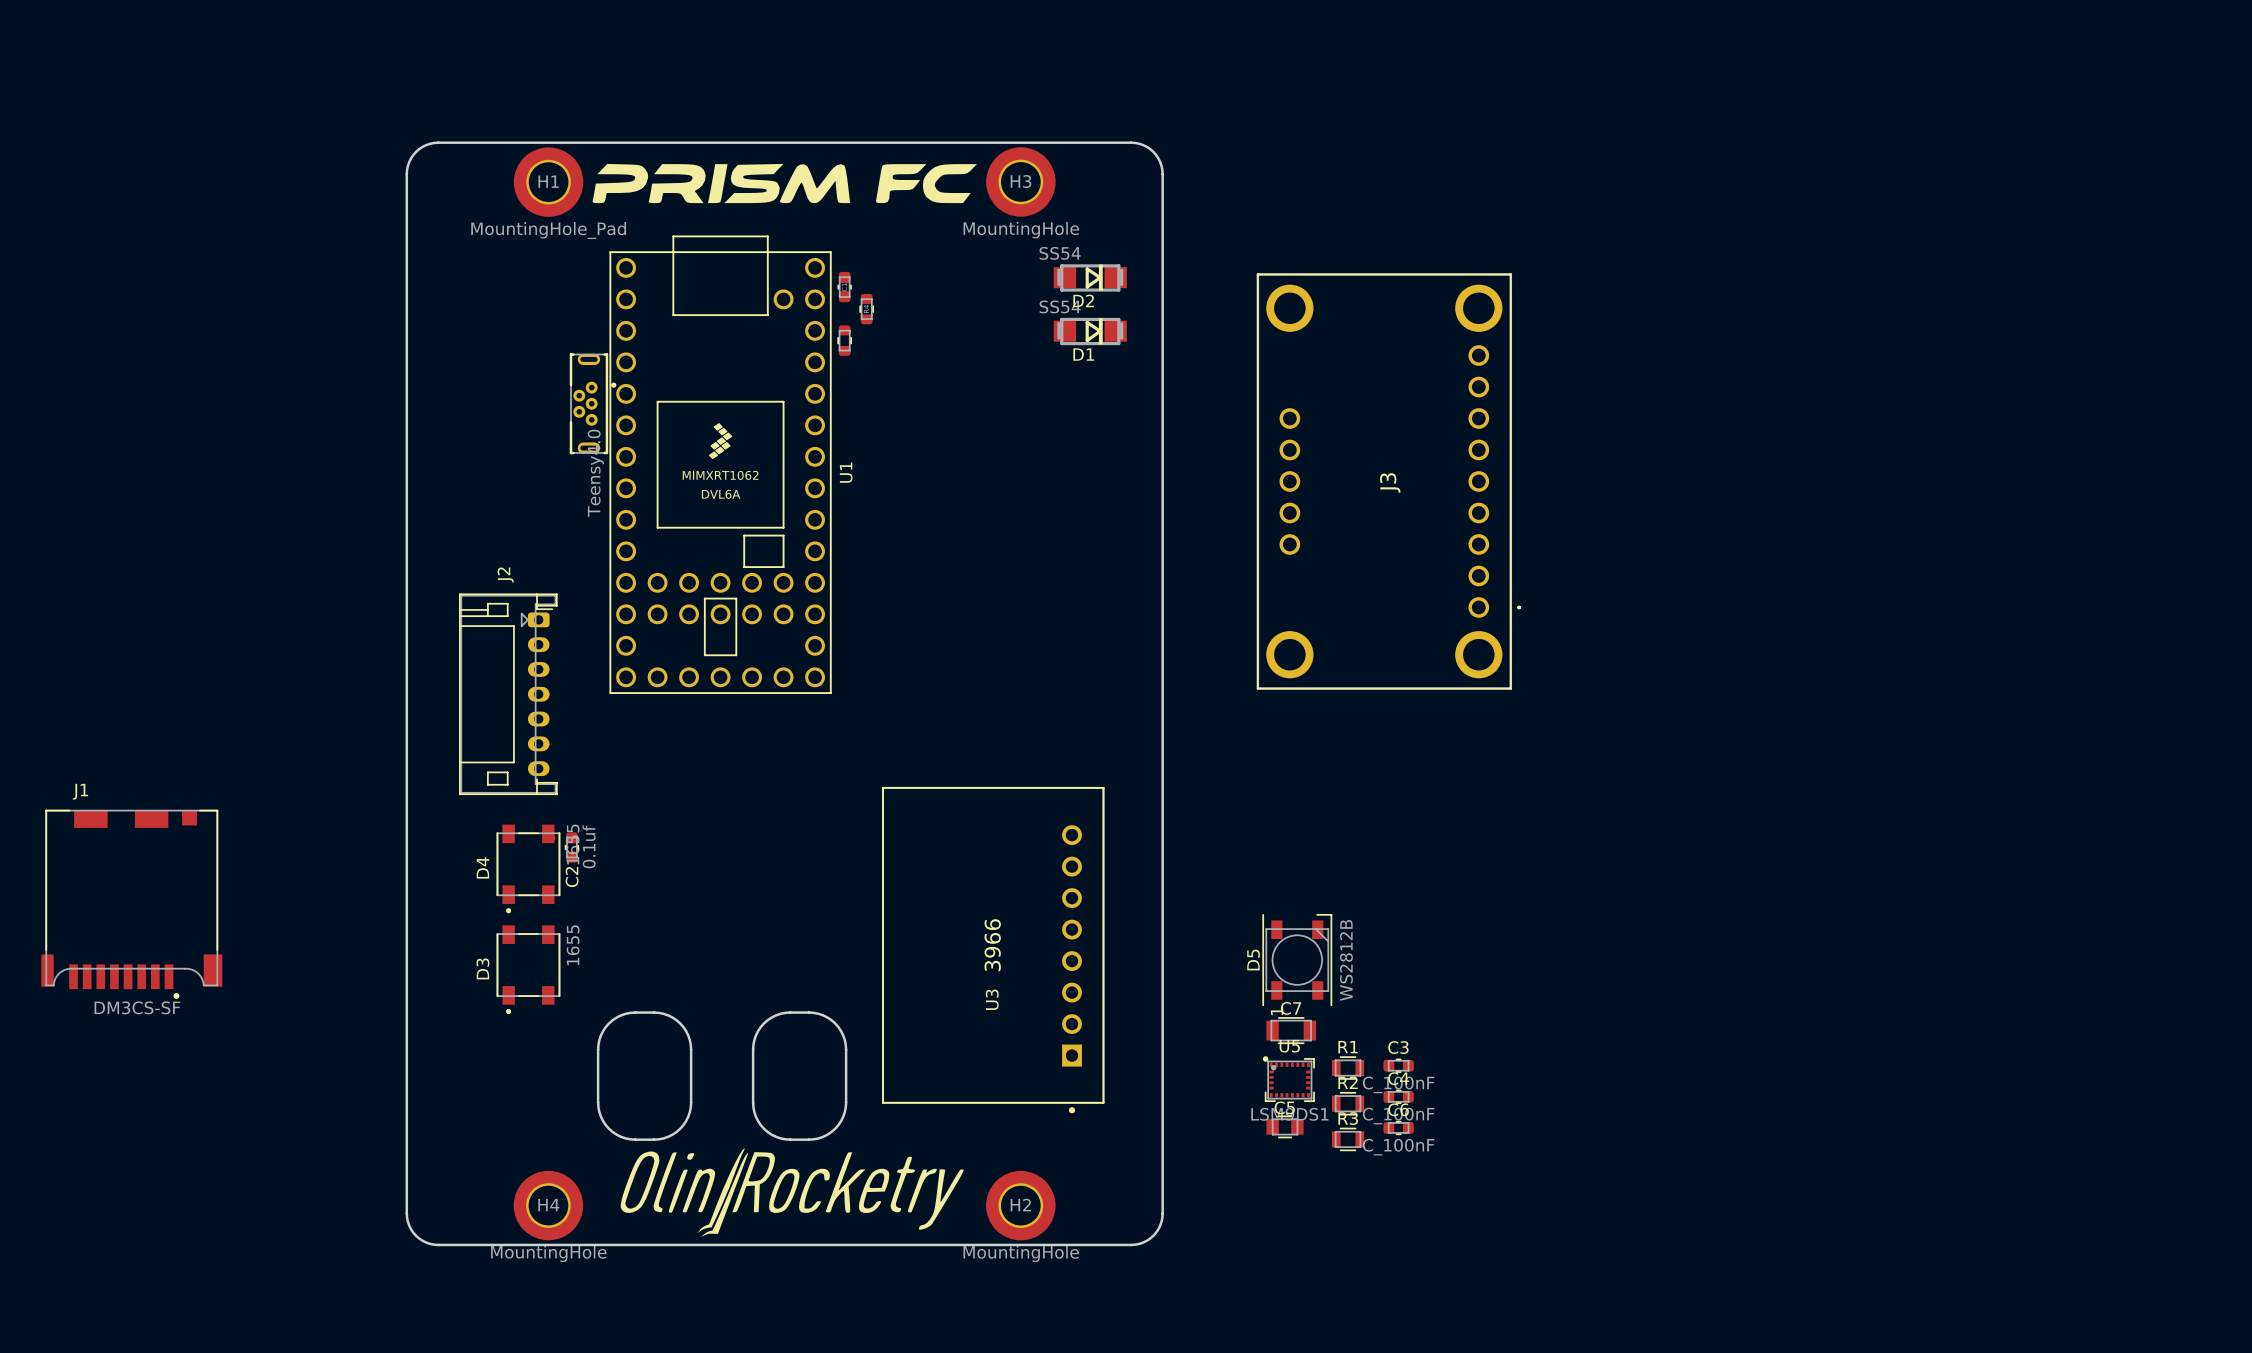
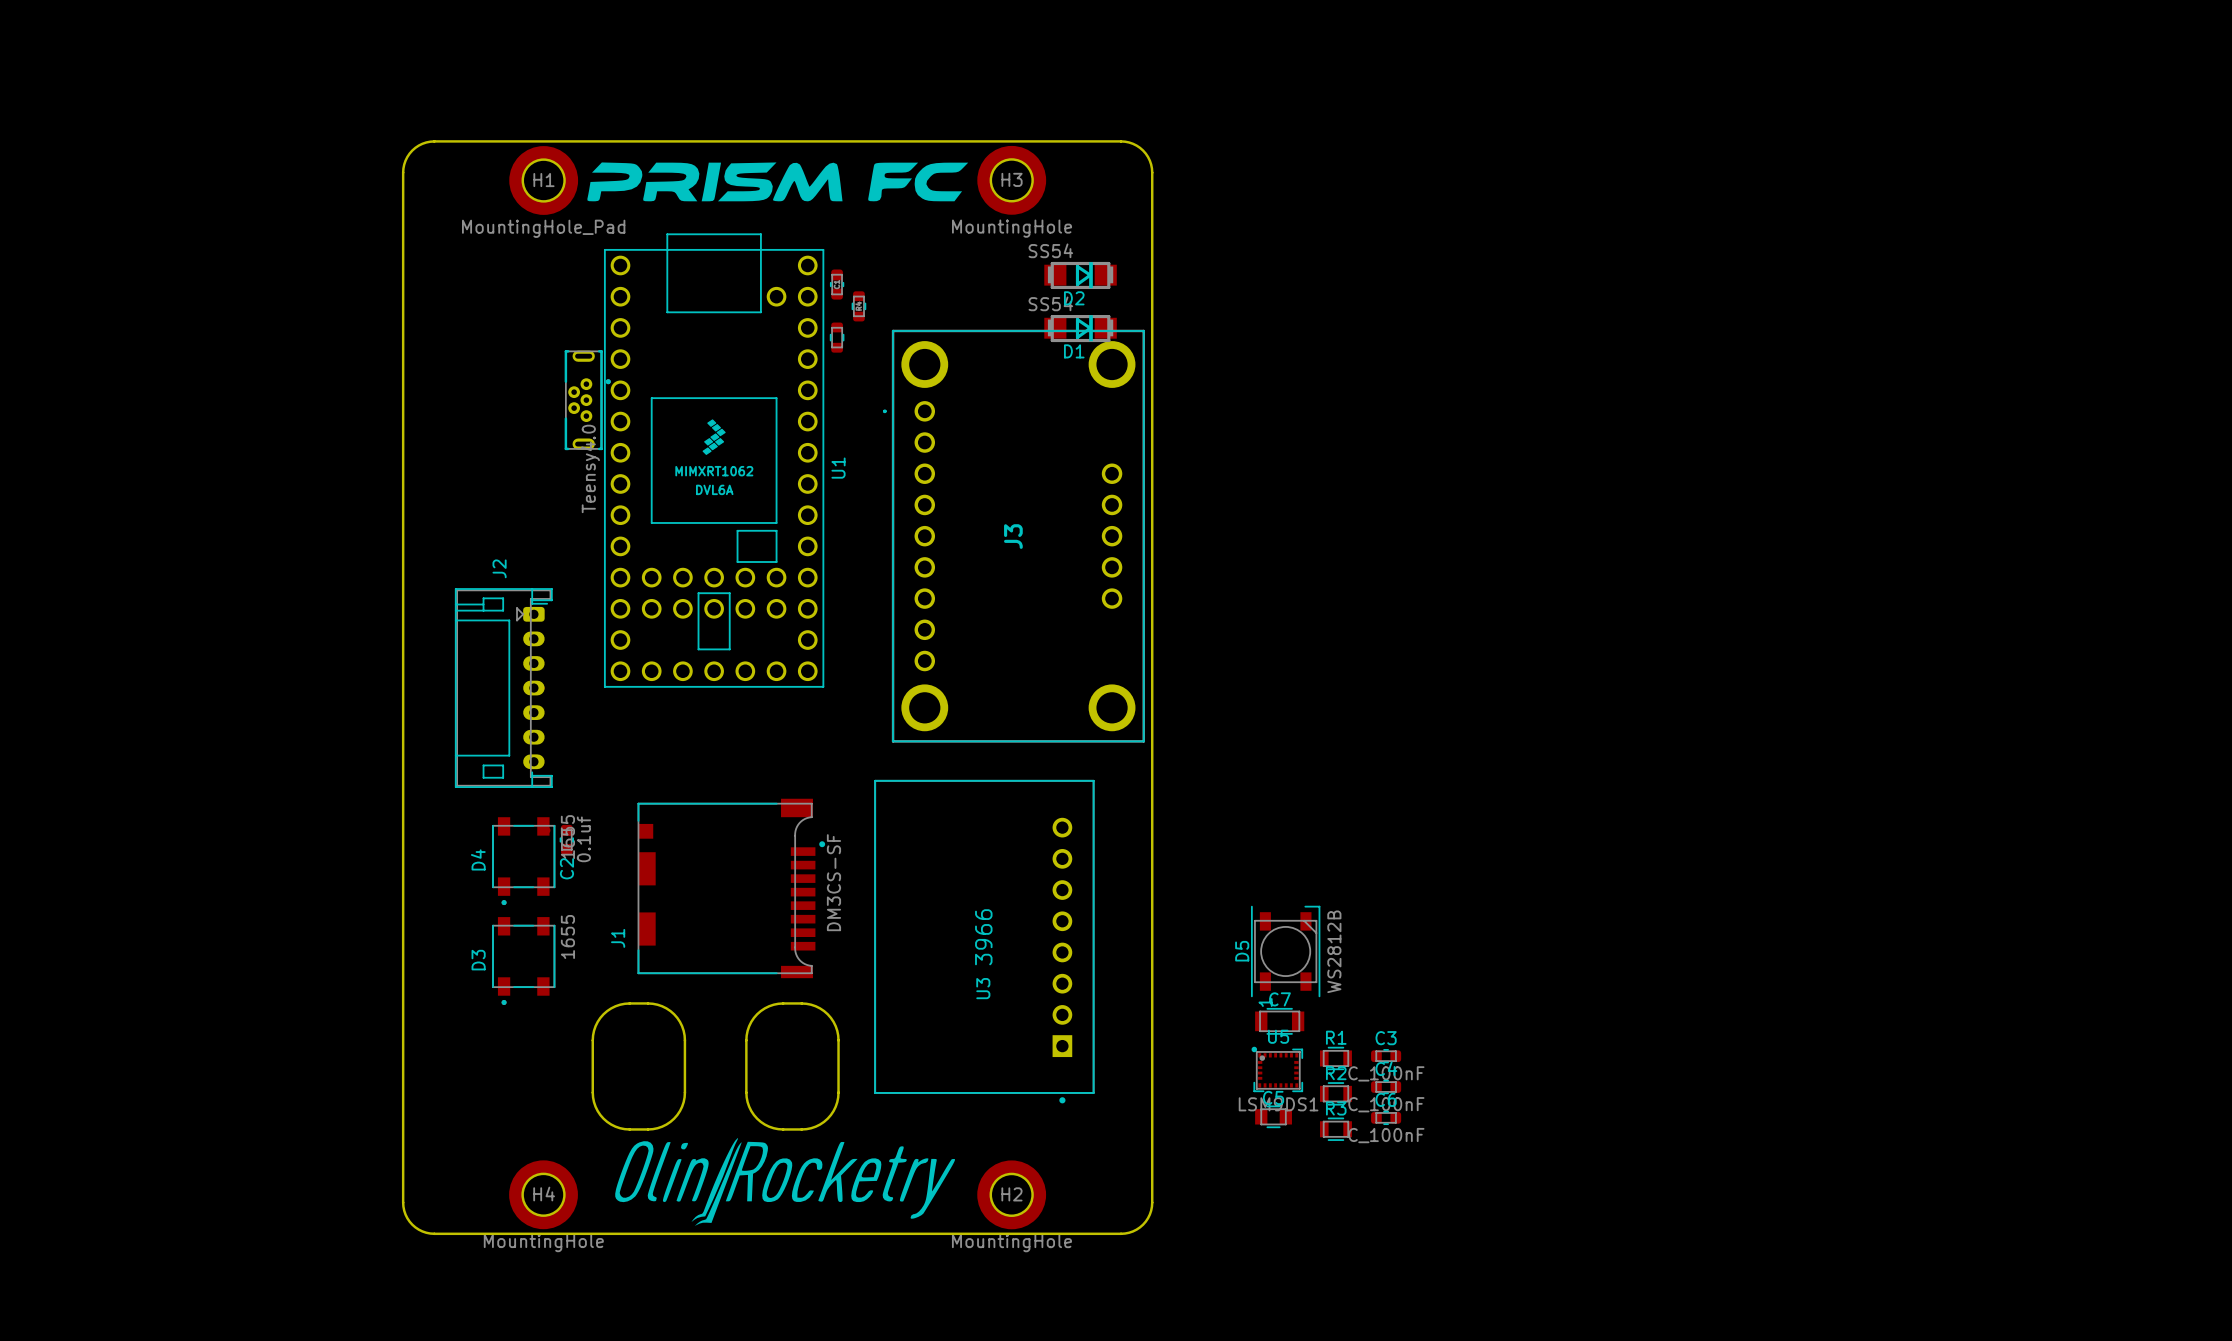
J3 rotation: 0° (1388, 481) -> 180° (1013, 536)
J3 position: (1388, 481) -> (1013, 536)
J1 rotation: 0° (131, 904) -> 90° counterclockwise (731, 888)
J1 position: (131, 904) -> (731, 888)

